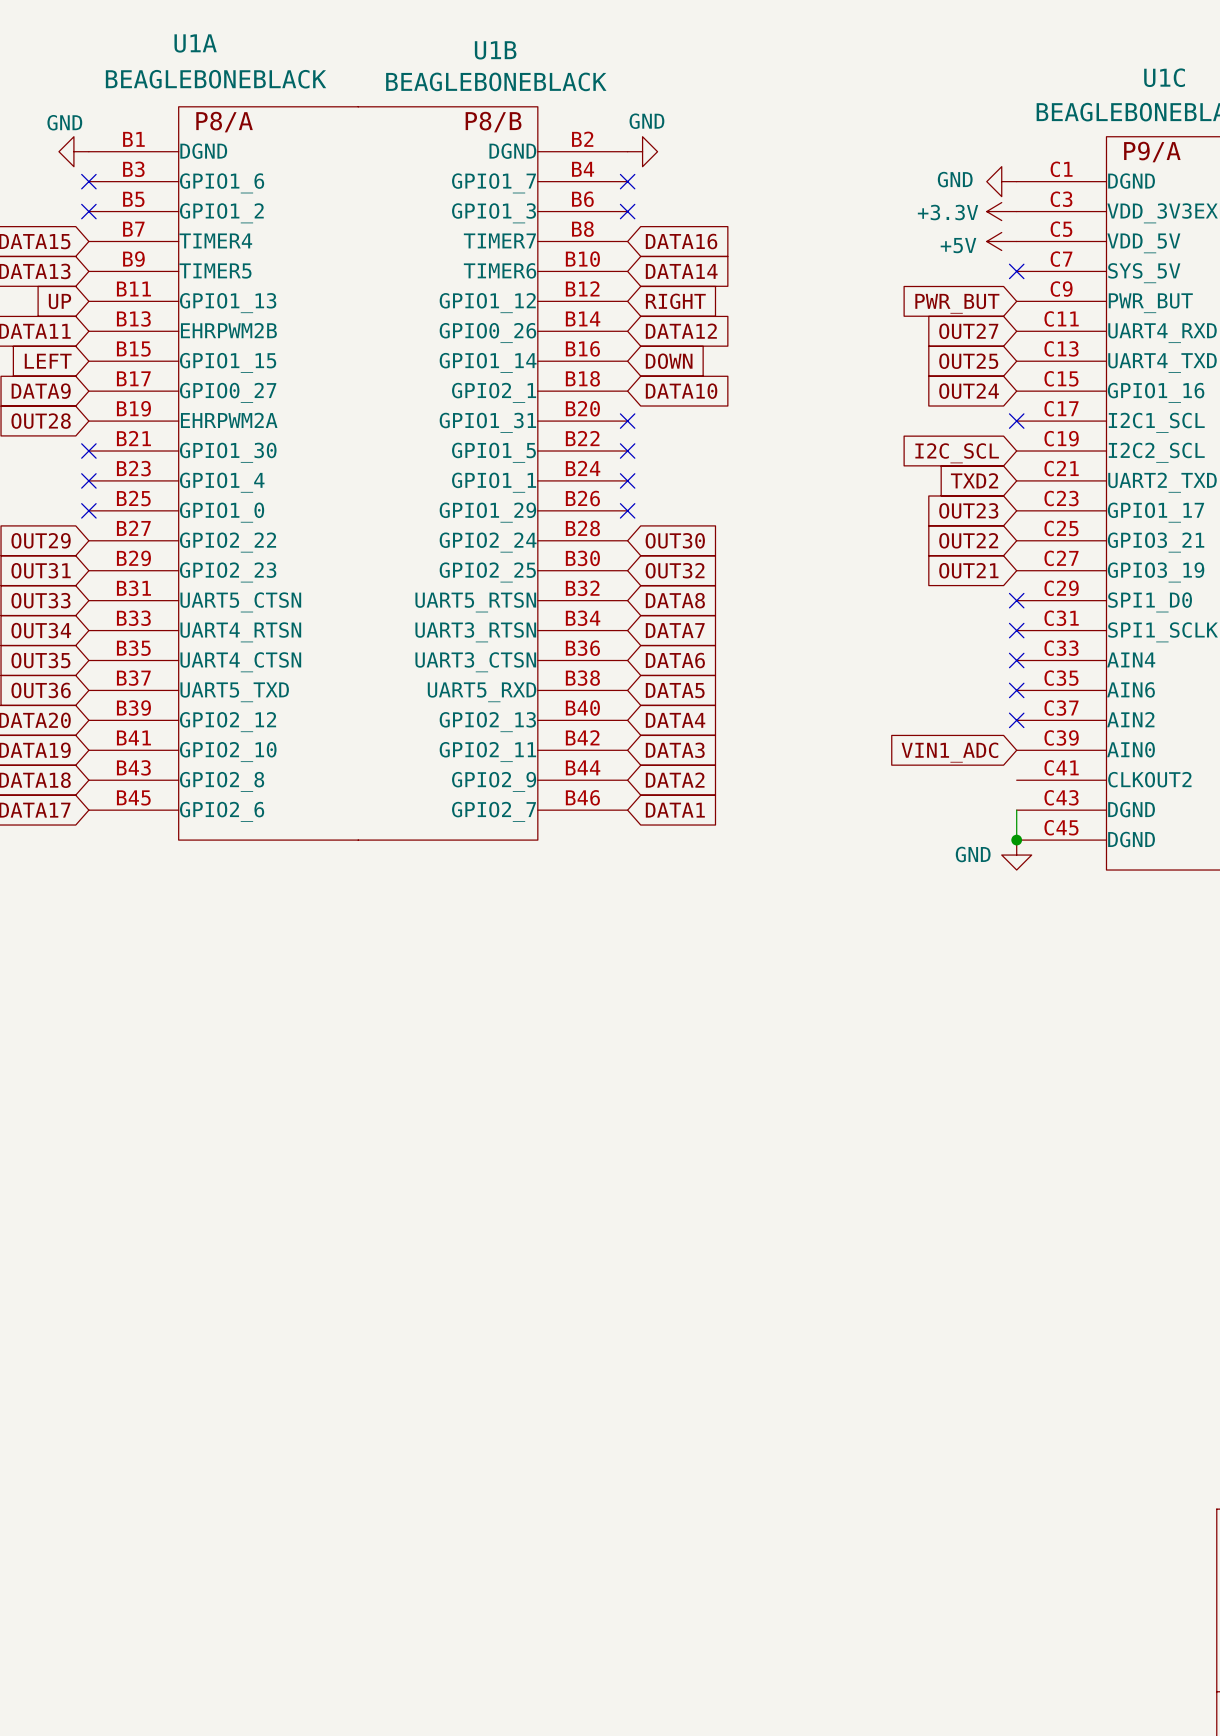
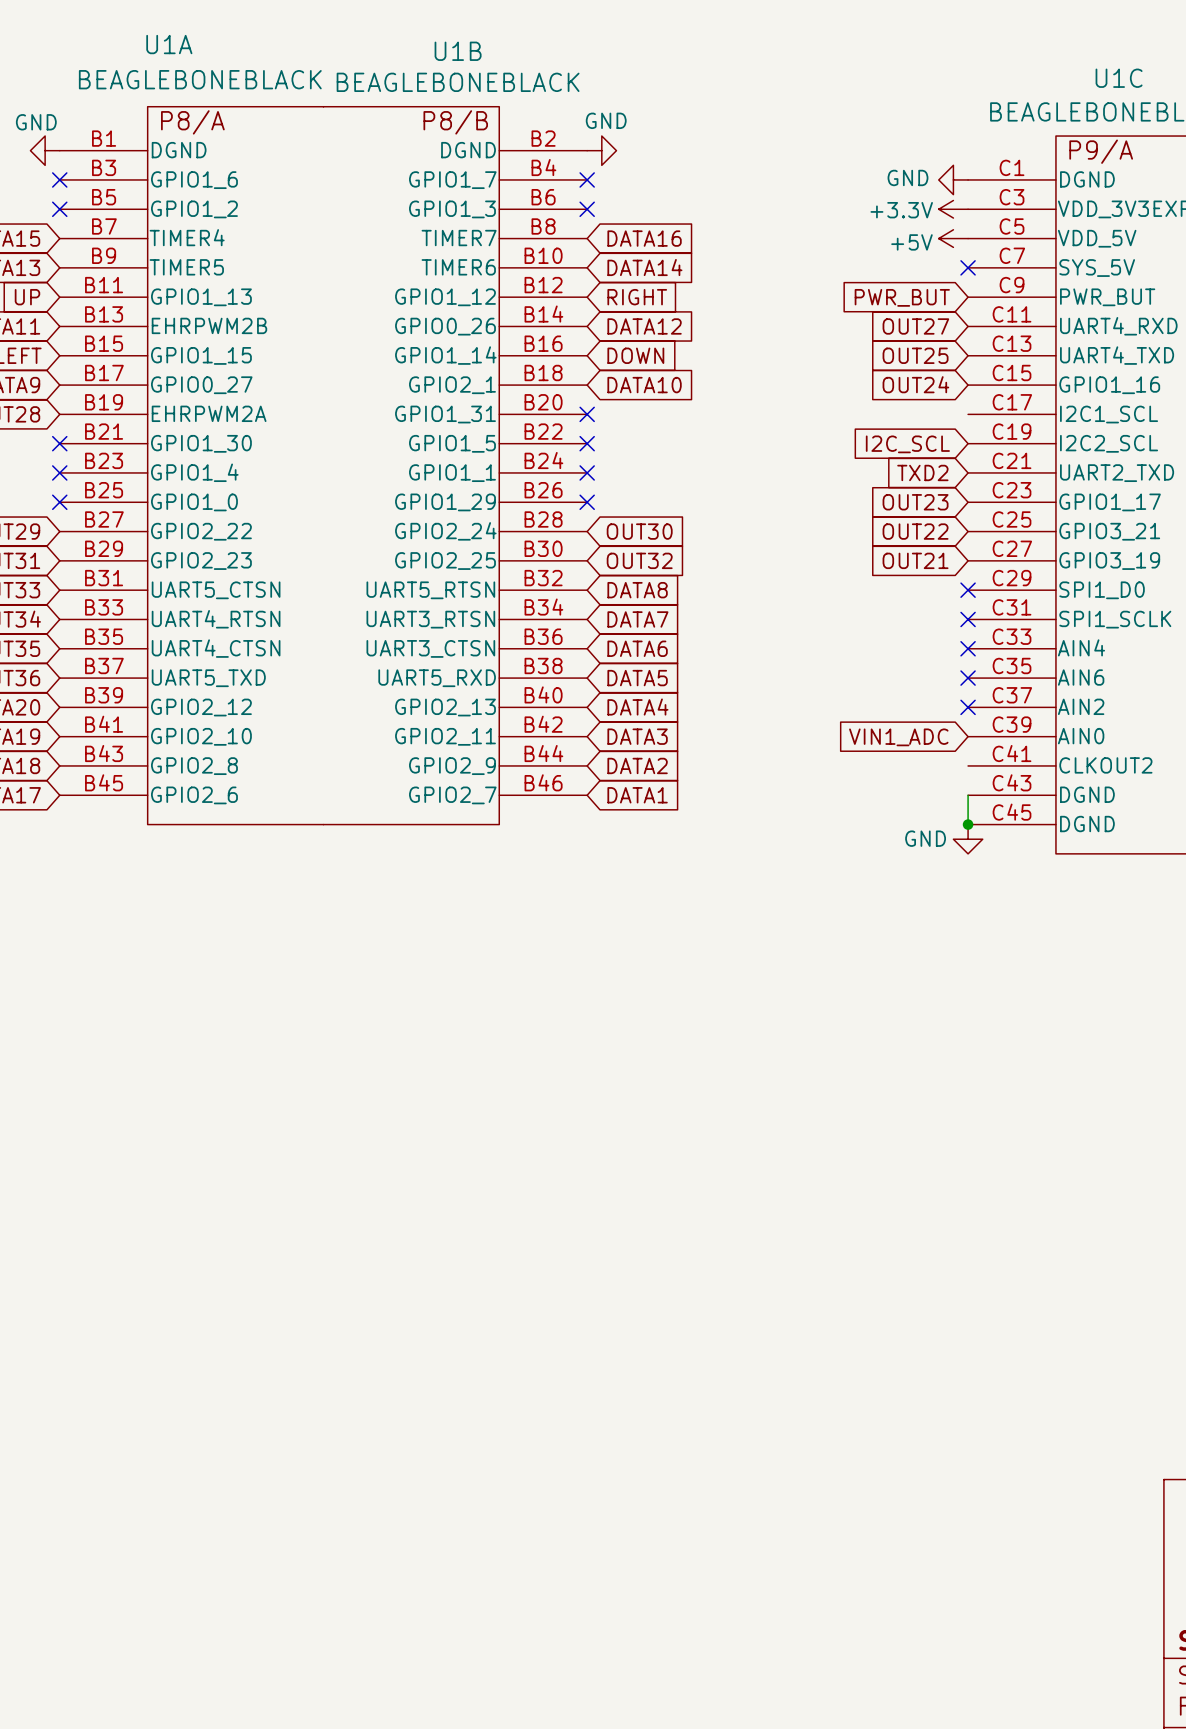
no-connect mark: (1016, 421) -> none

